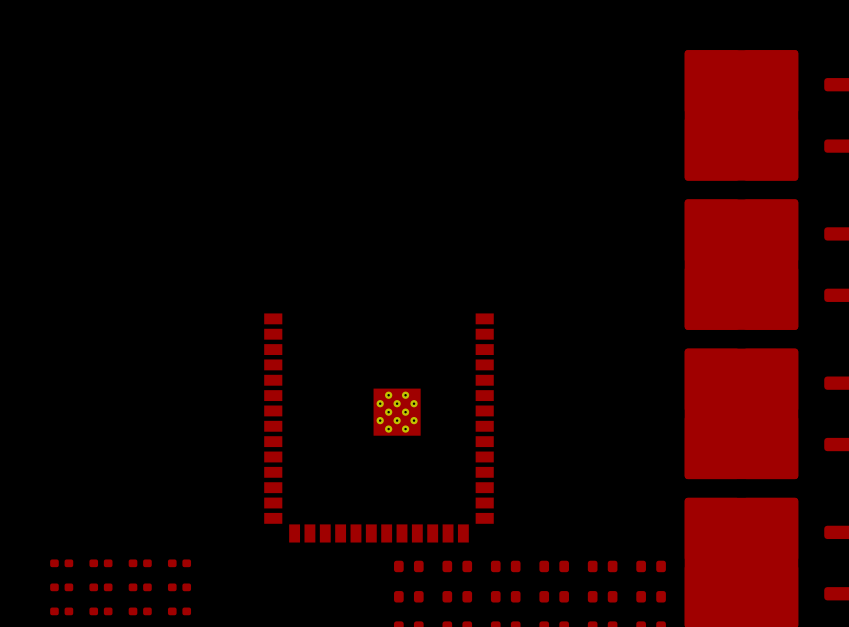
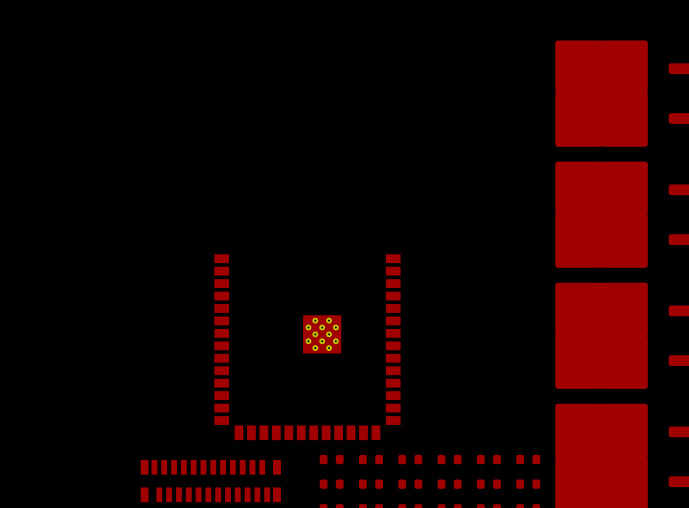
part: (61, 563) -> none
part: (100, 563) -> none
part: (140, 563) -> none
part: (179, 563) -> none
part: (61, 587) -> none
part: (100, 587) -> none
part: (140, 587) -> none
part: (179, 587) -> none
part: none -> (210, 481)
part: (61, 611) -> none
part: (100, 611) -> none
part: (140, 611) -> none
part: (179, 611) -> none

